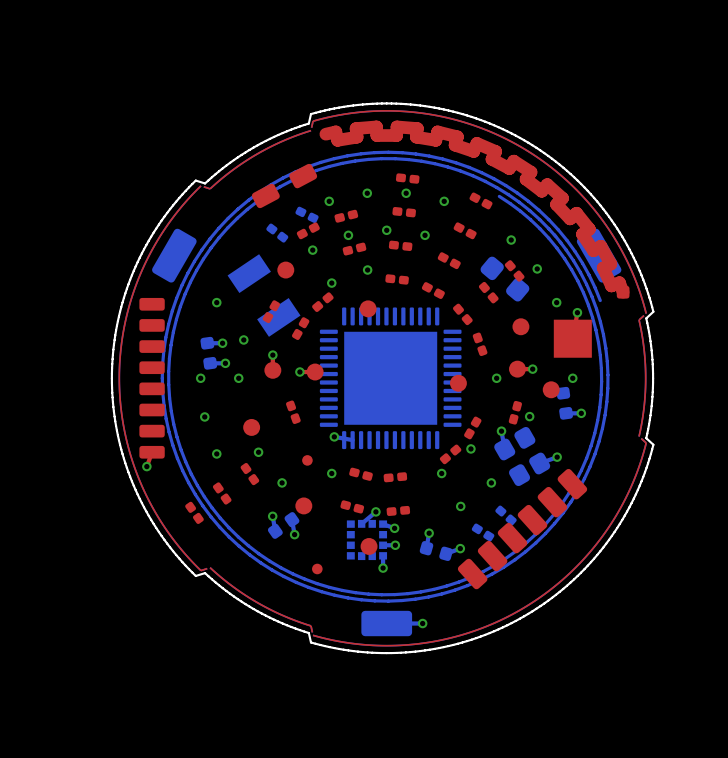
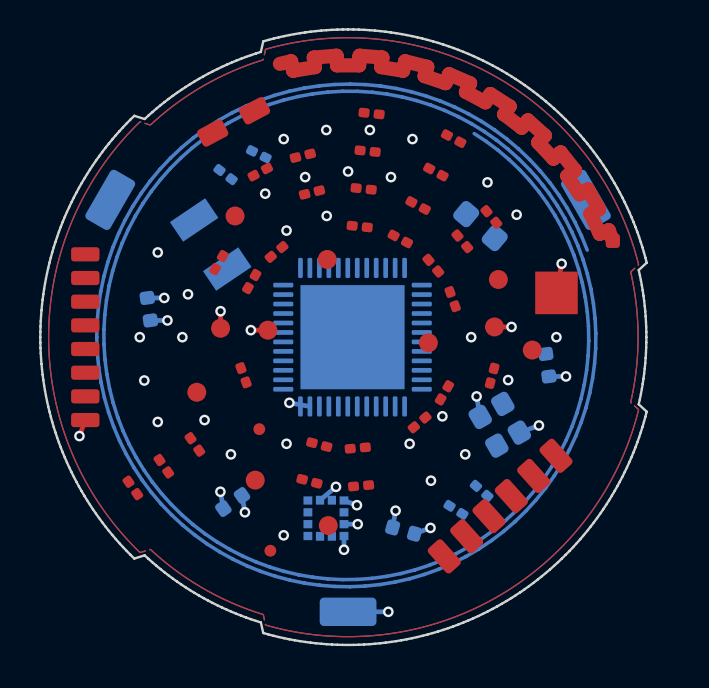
via: (556, 302) -> none
via: none -> (283, 535)

